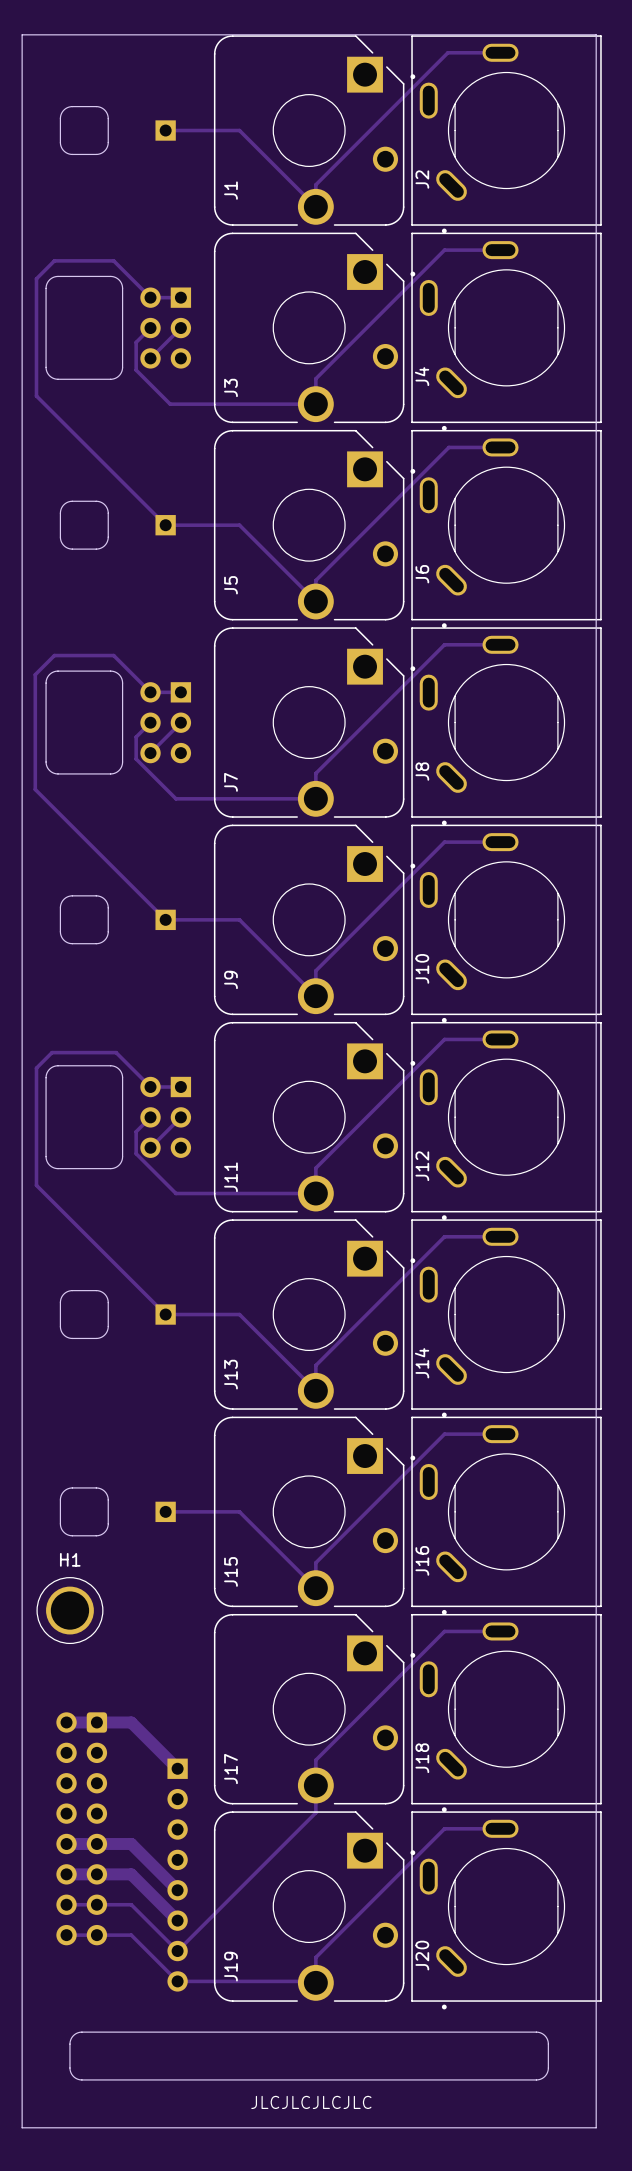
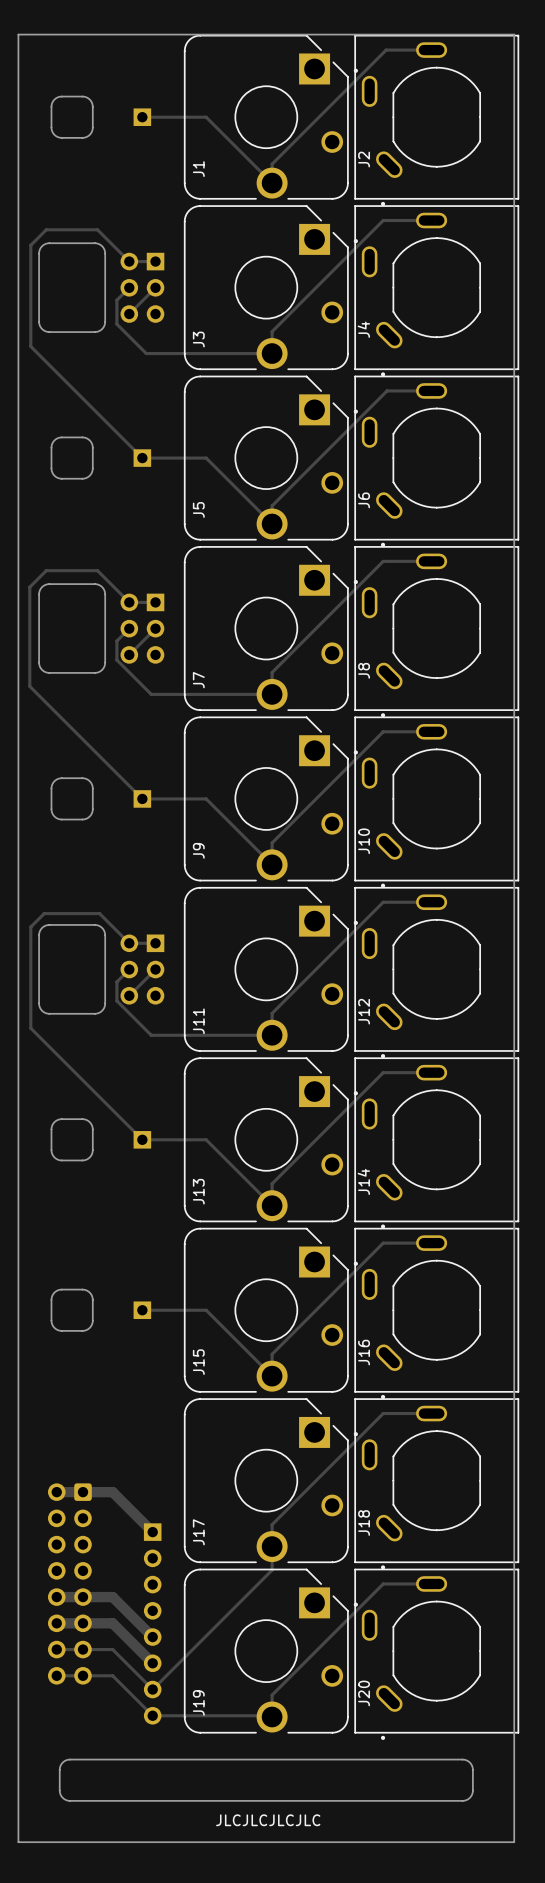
J2 footprint: [411, 35, 602, 234] -> [354, 34, 520, 207]
J4 footprint: [411, 232, 602, 431] -> [354, 205, 520, 377]
J6 footprint: [411, 429, 602, 629] -> [354, 375, 520, 547]
J8 footprint: [411, 627, 602, 826] -> [354, 546, 520, 718]
J10 footprint: [411, 824, 602, 1023] -> [354, 716, 520, 888]
J12 footprint: [411, 1021, 602, 1221] -> [354, 887, 520, 1059]
J14 footprint: [411, 1219, 602, 1418] -> [354, 1057, 520, 1229]
J16 footprint: [411, 1416, 602, 1615] -> [354, 1227, 520, 1400]
drawing: [36, 1577, 104, 1645] -> none
H1: (69, 1610) -> none
J18 footprint: [411, 1613, 602, 1813] -> [354, 1398, 520, 1570]
J20 footprint: [411, 1811, 602, 2010] -> [354, 1568, 520, 1740]

